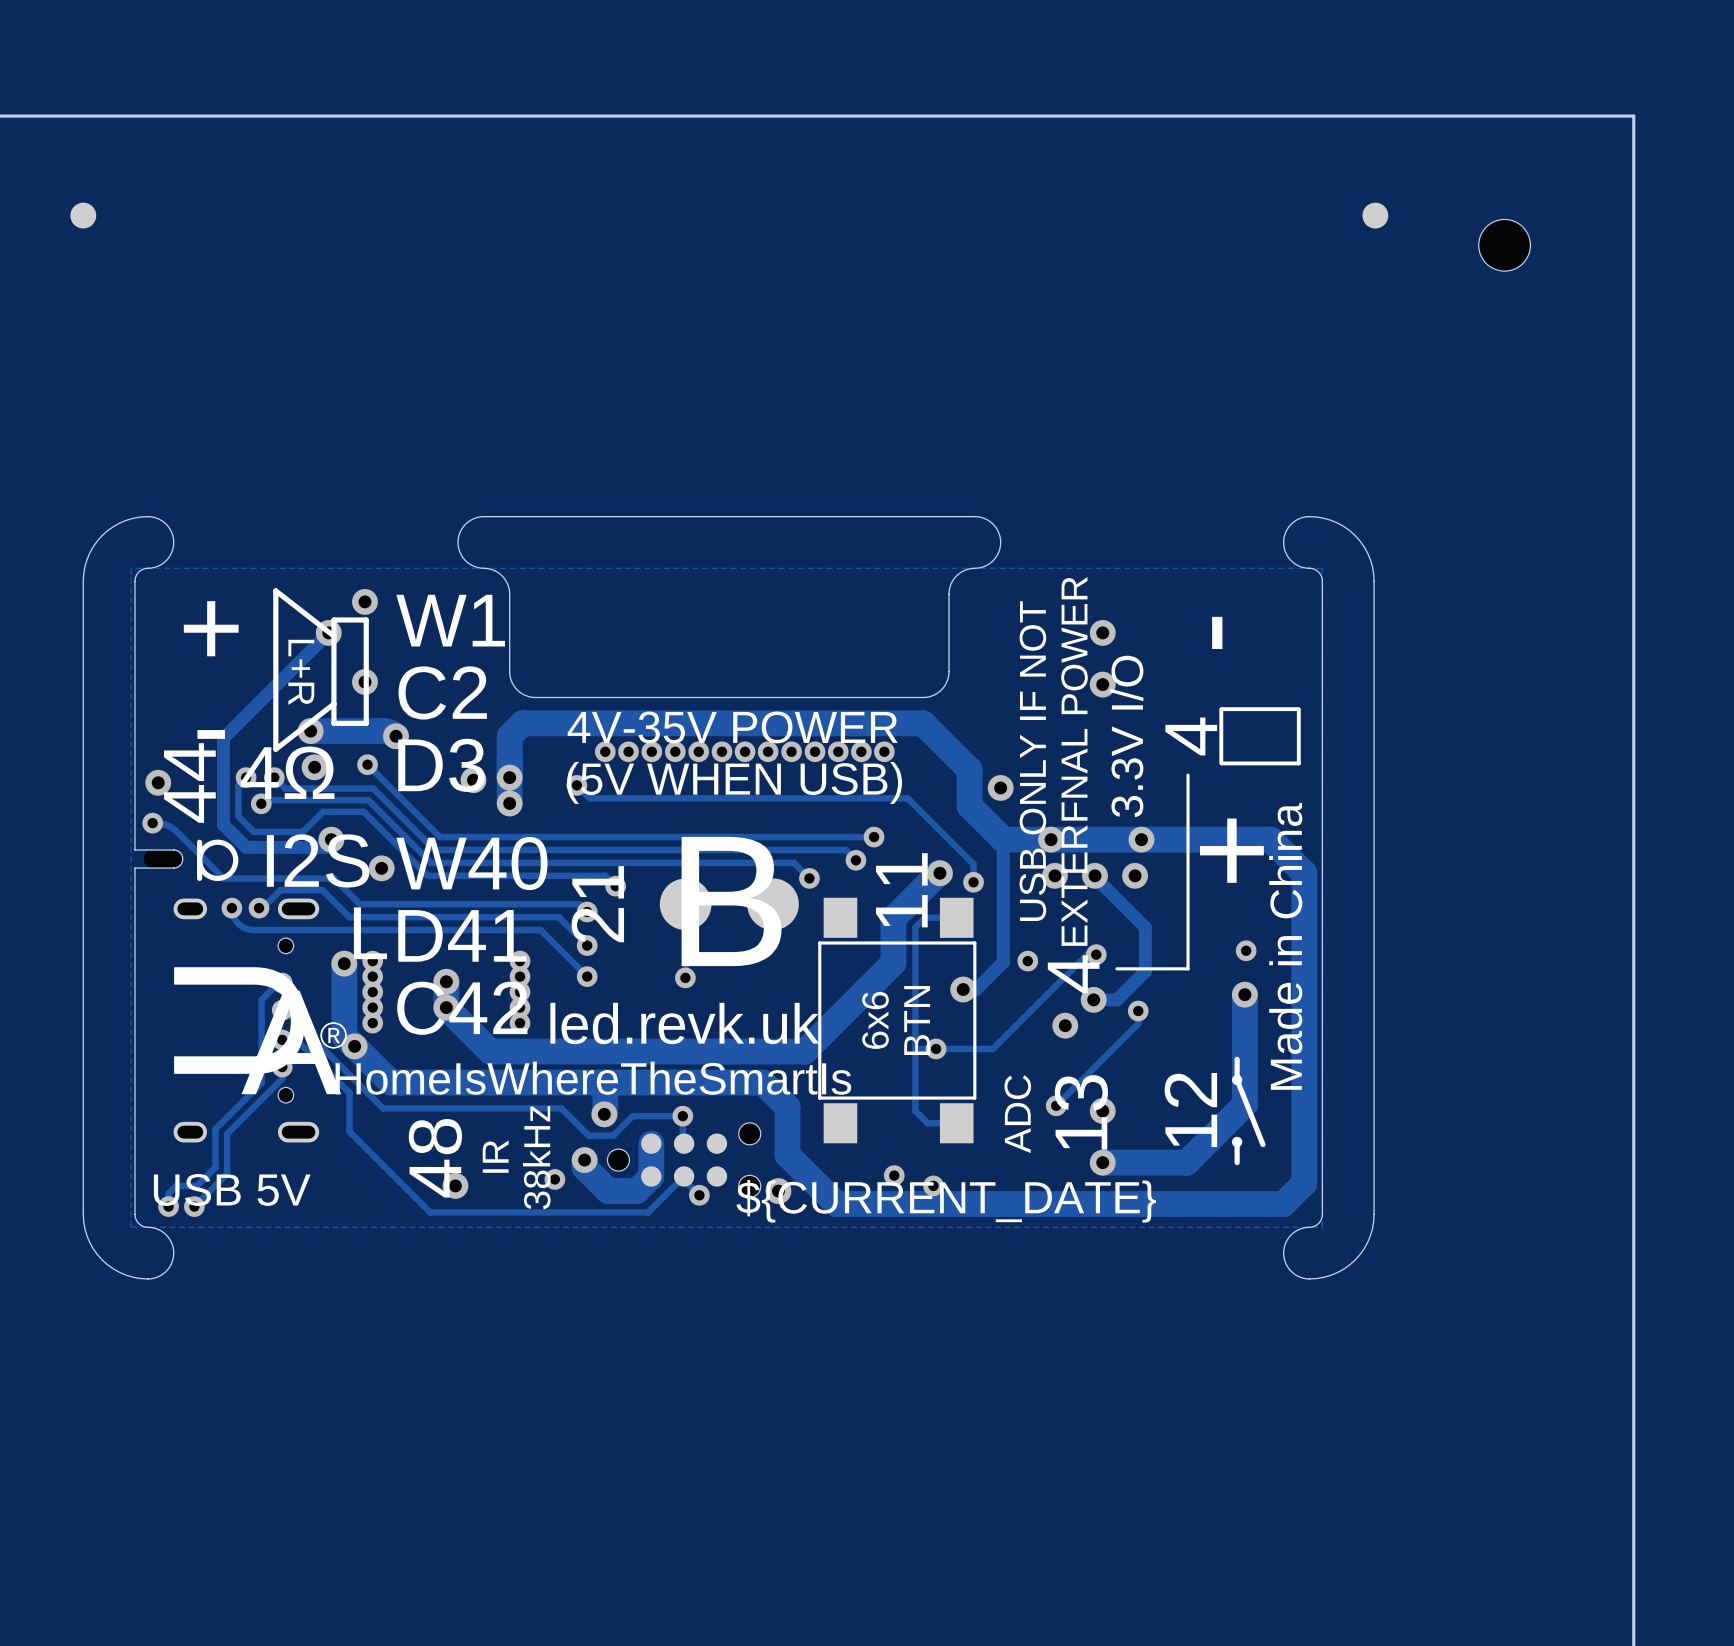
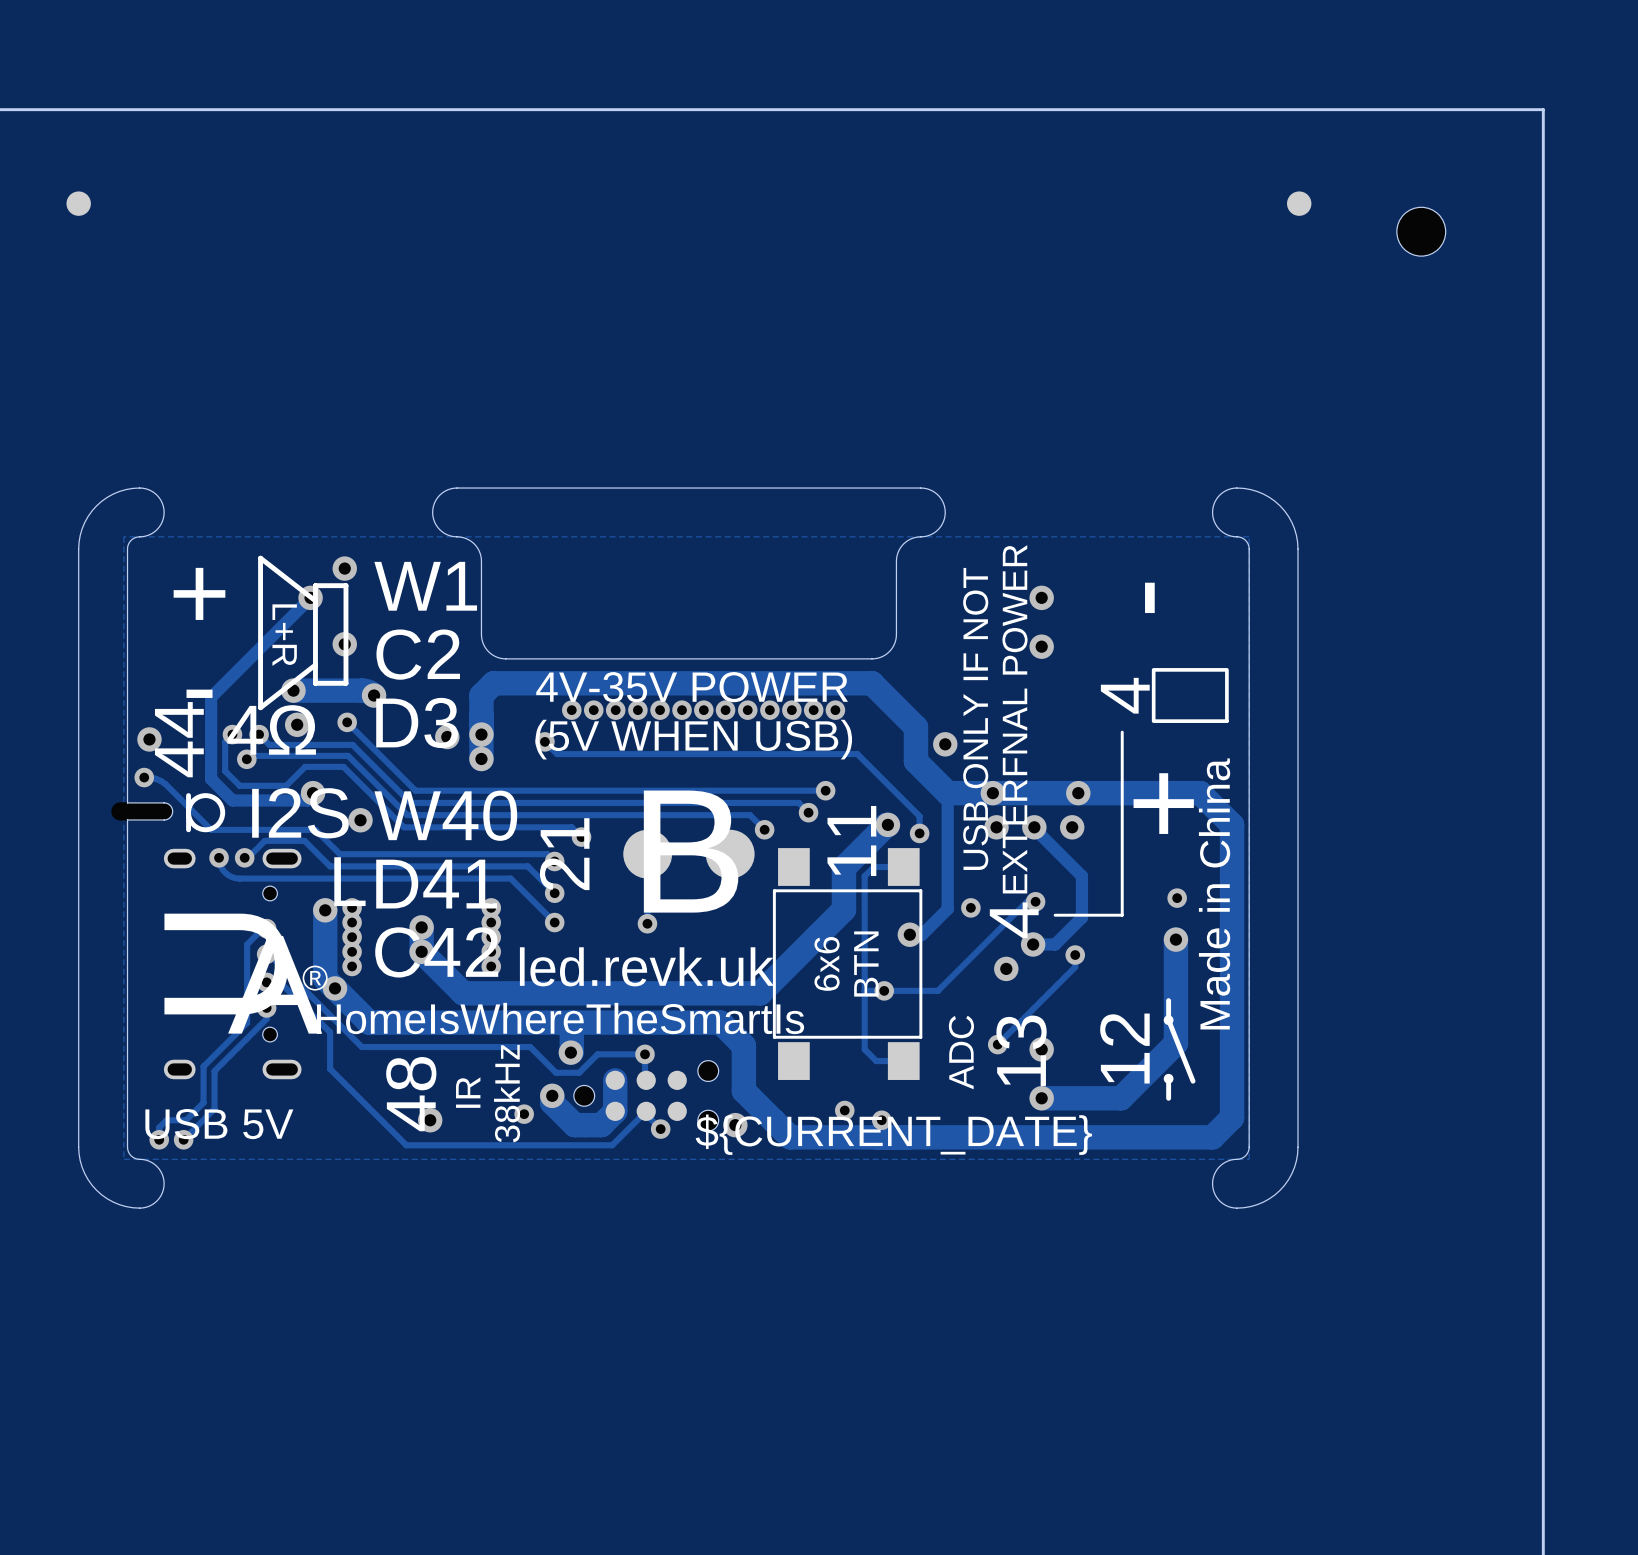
text: 3.3V I/O (1126, 736) -> none
part footprint: [143, 849, 183, 869] -> [111, 802, 173, 821]

